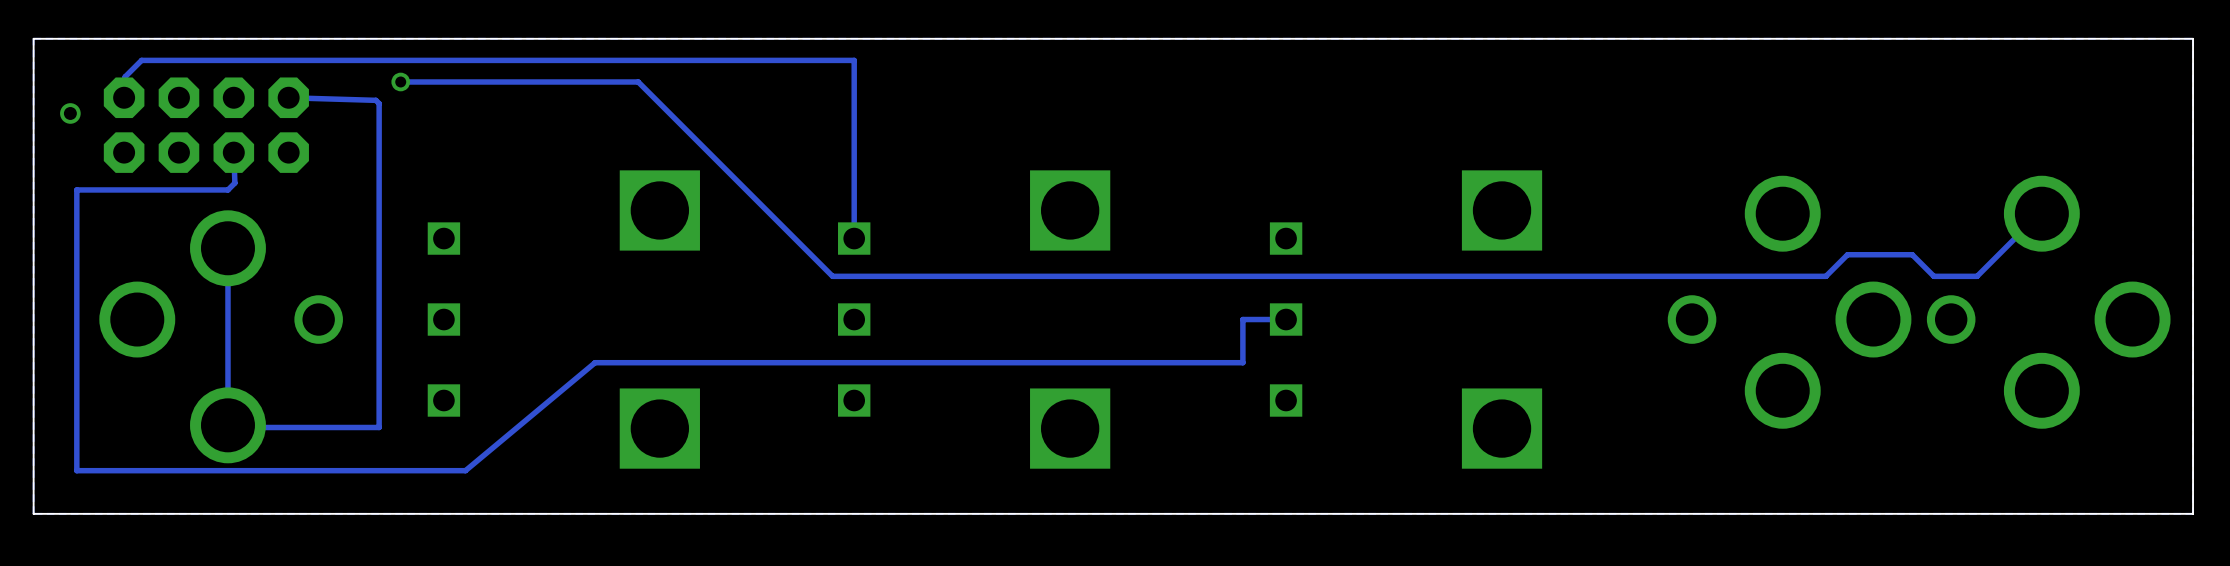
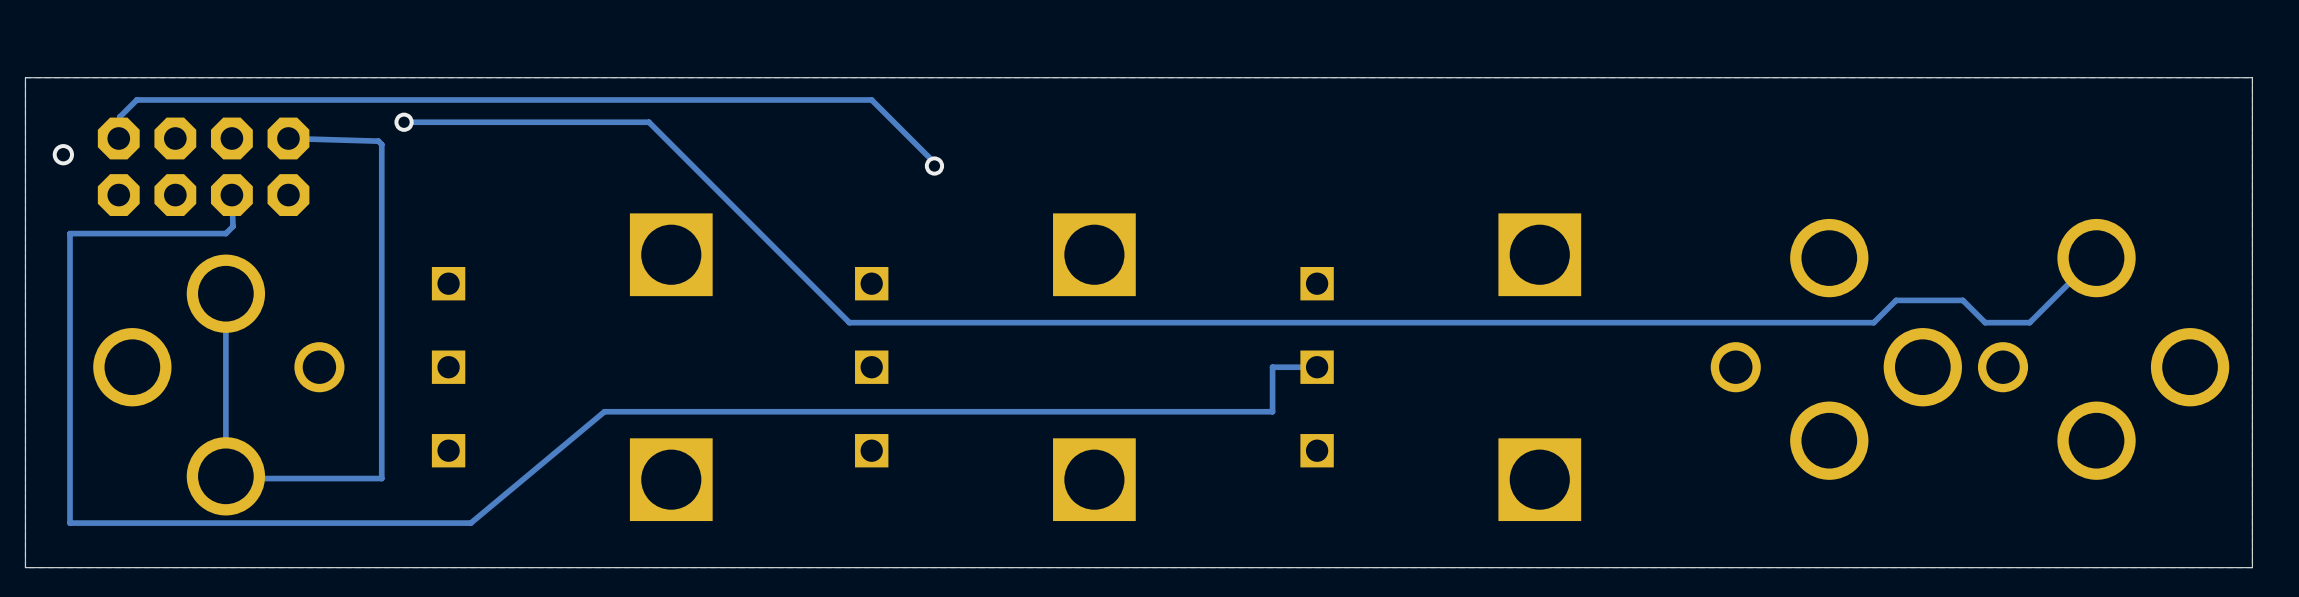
track: (854, 60) (854, 238) -> (871, 99) (934, 162) (934, 166)
via: none -> (934, 166)

